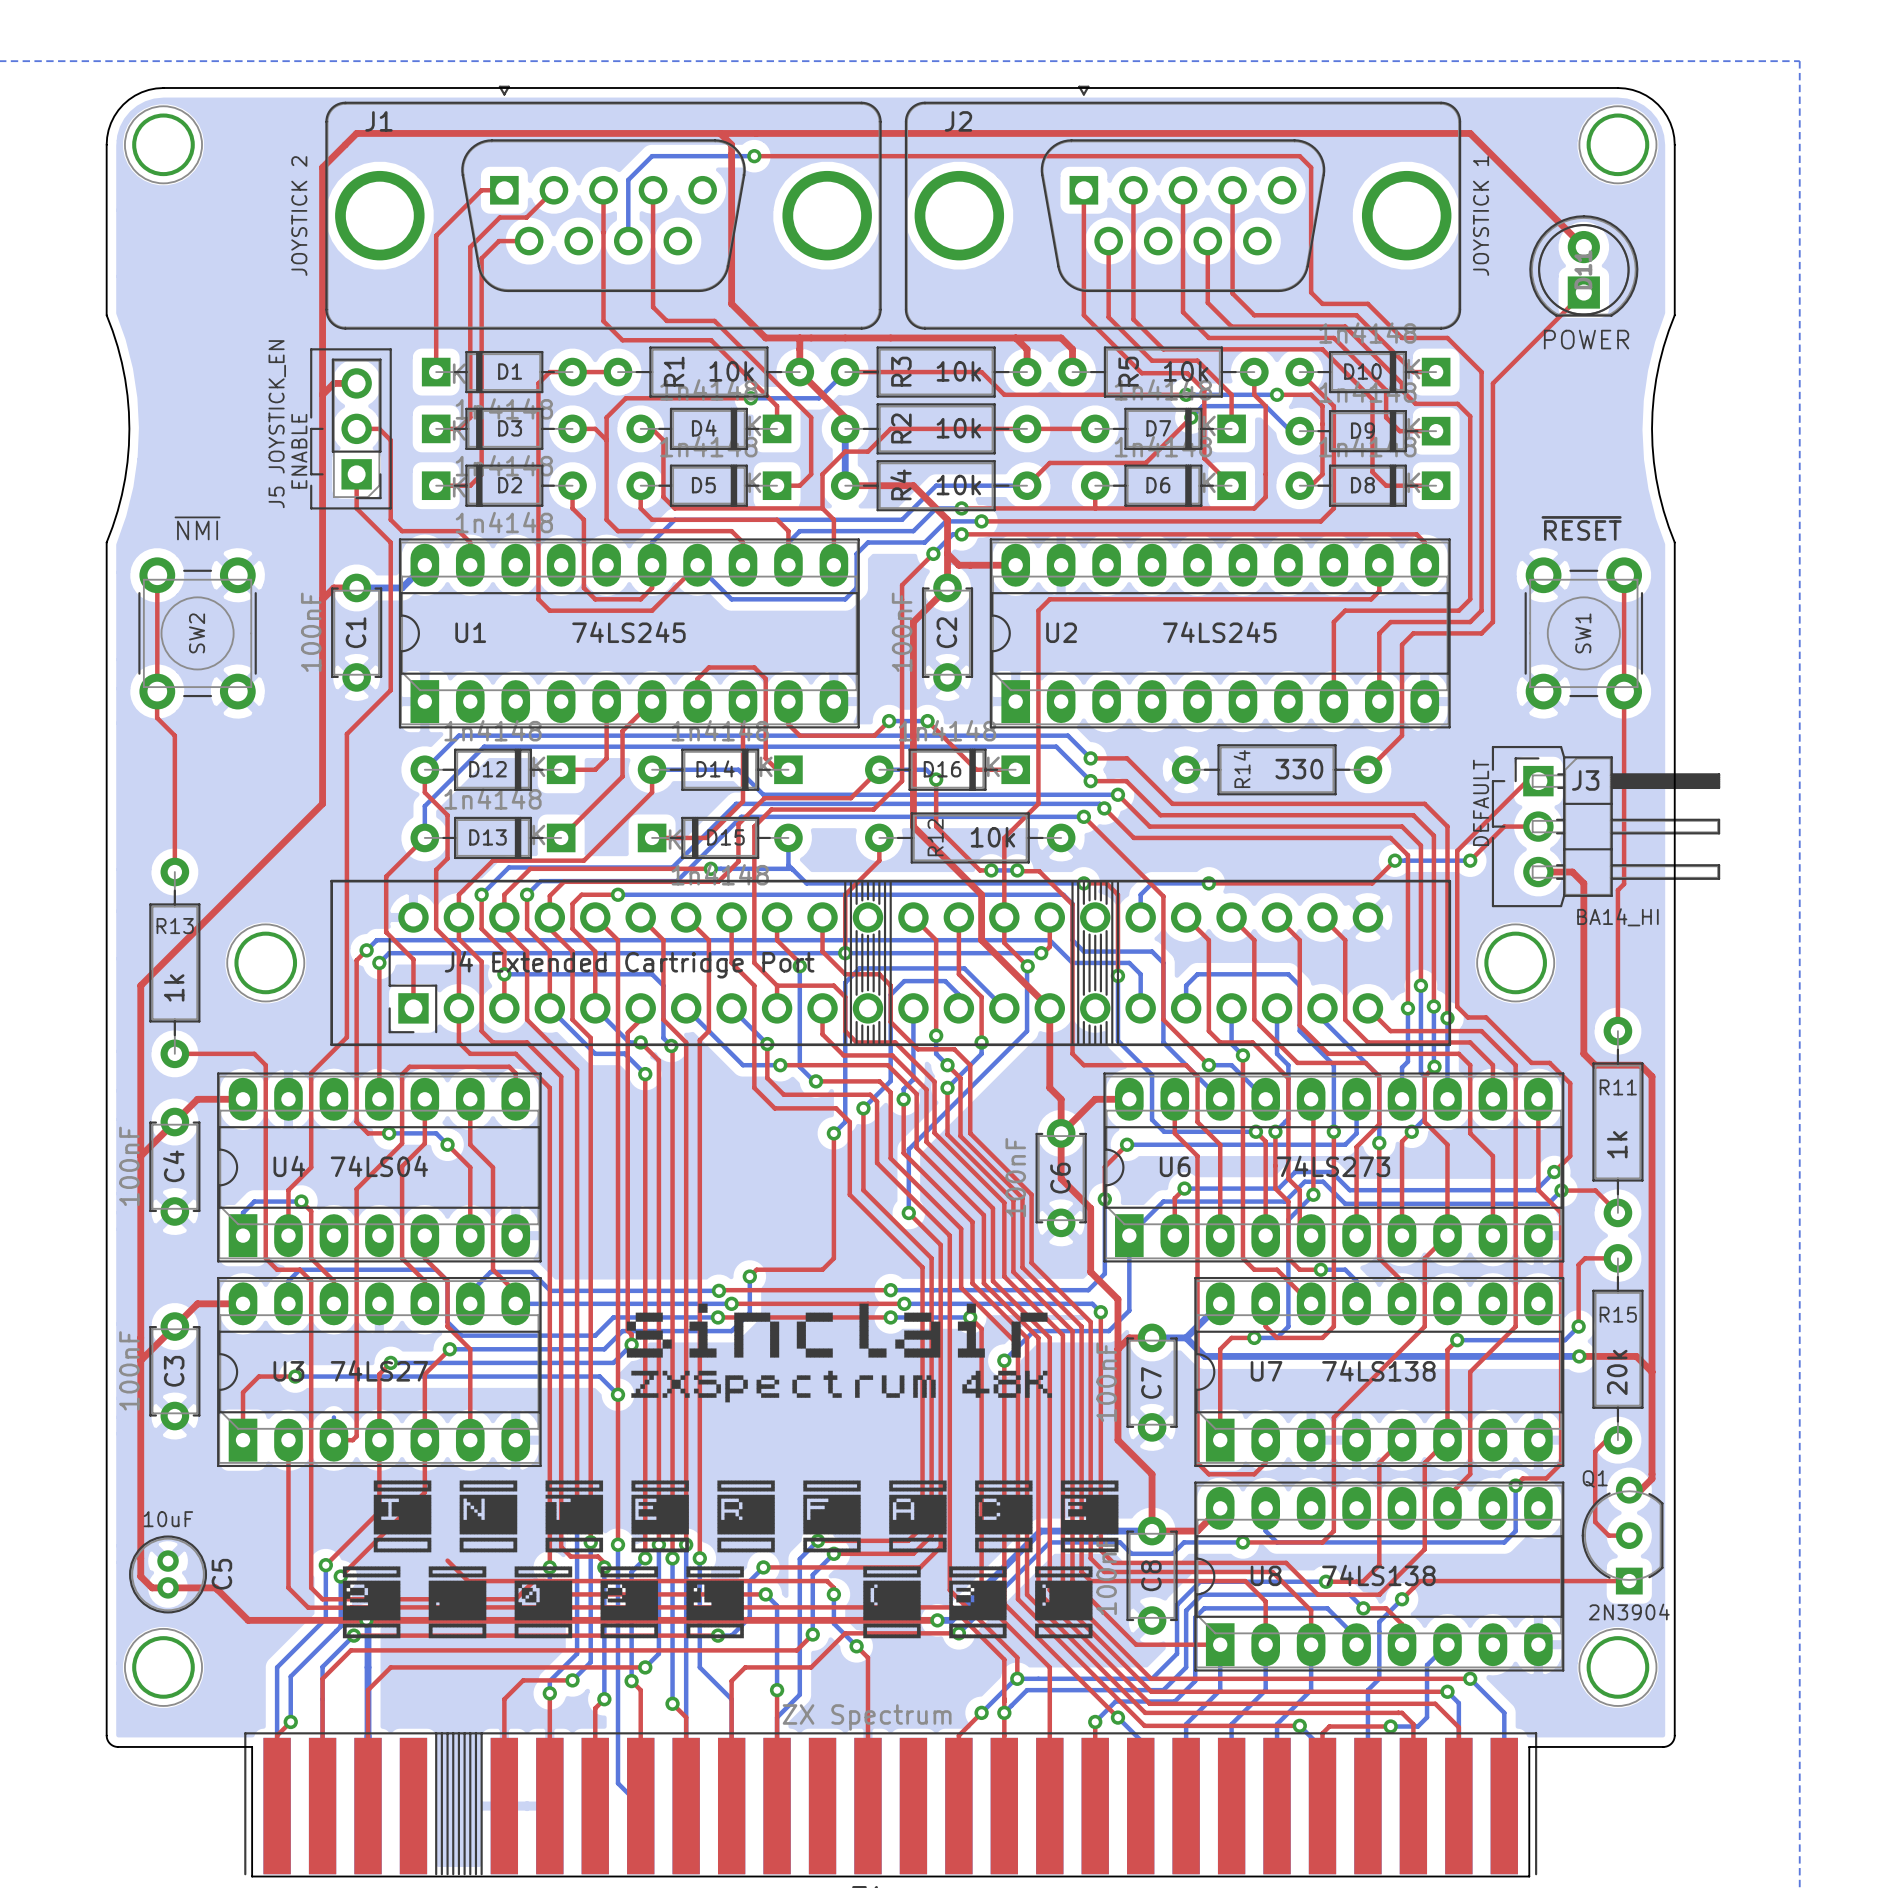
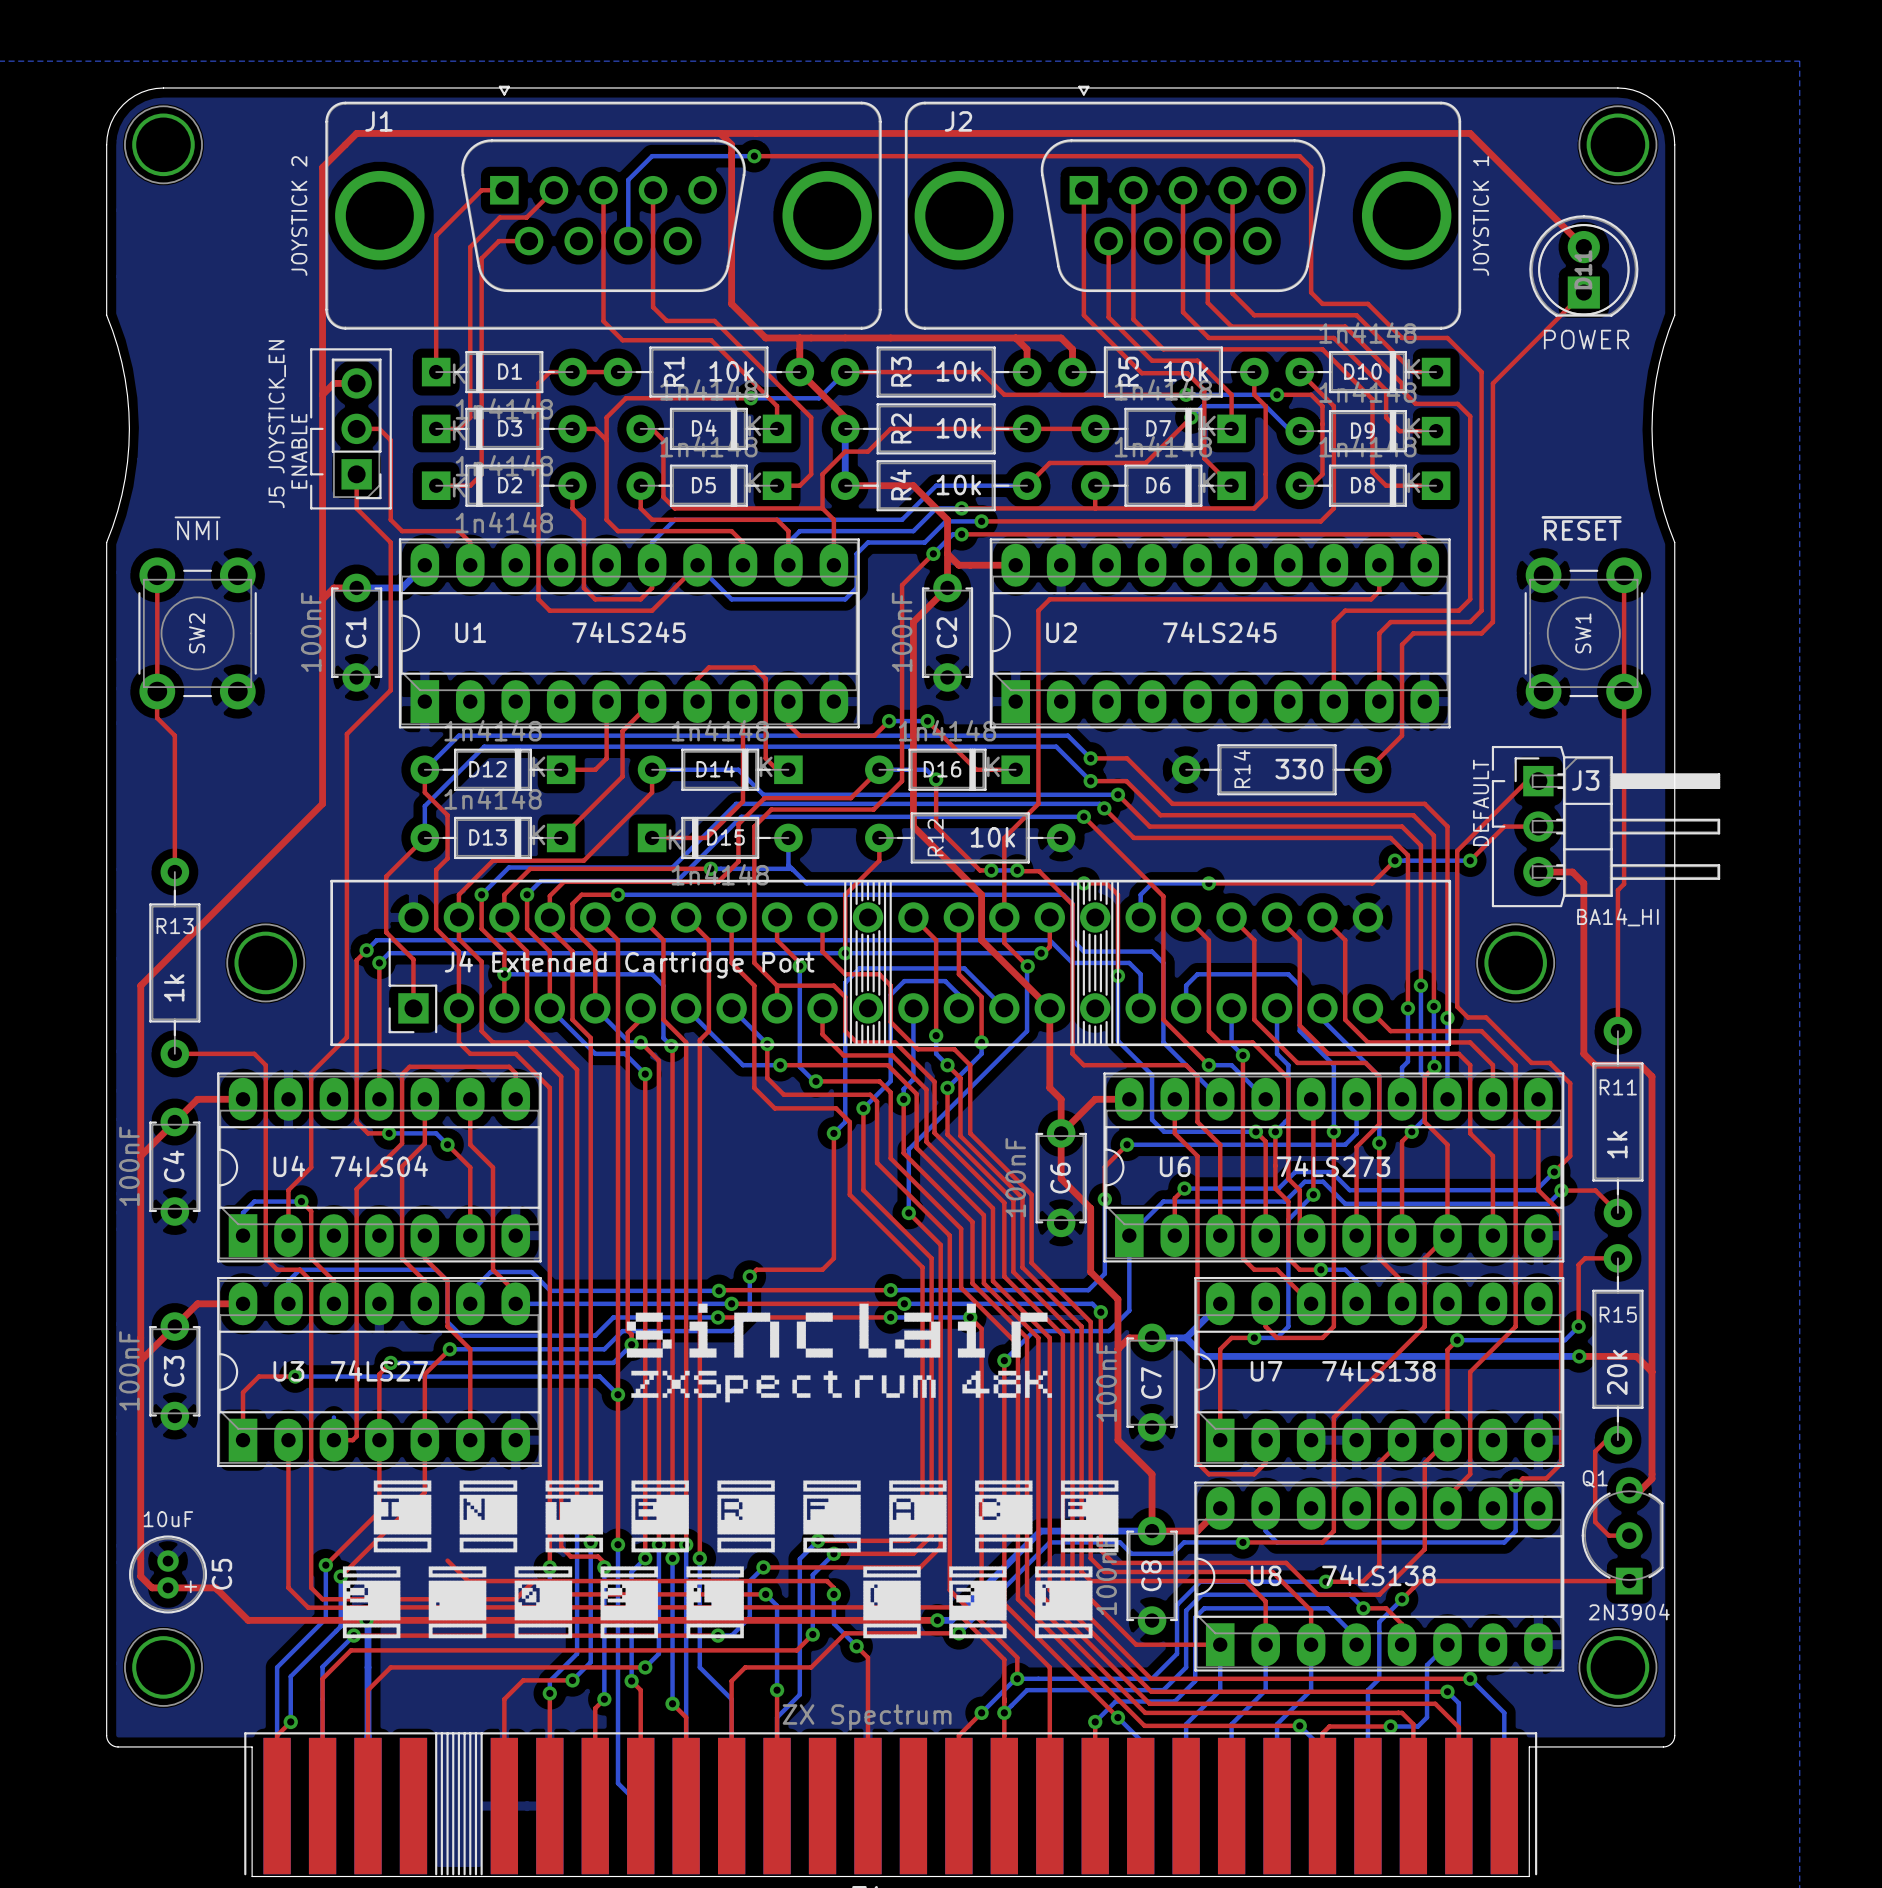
text: none -> + (190, 1586)

